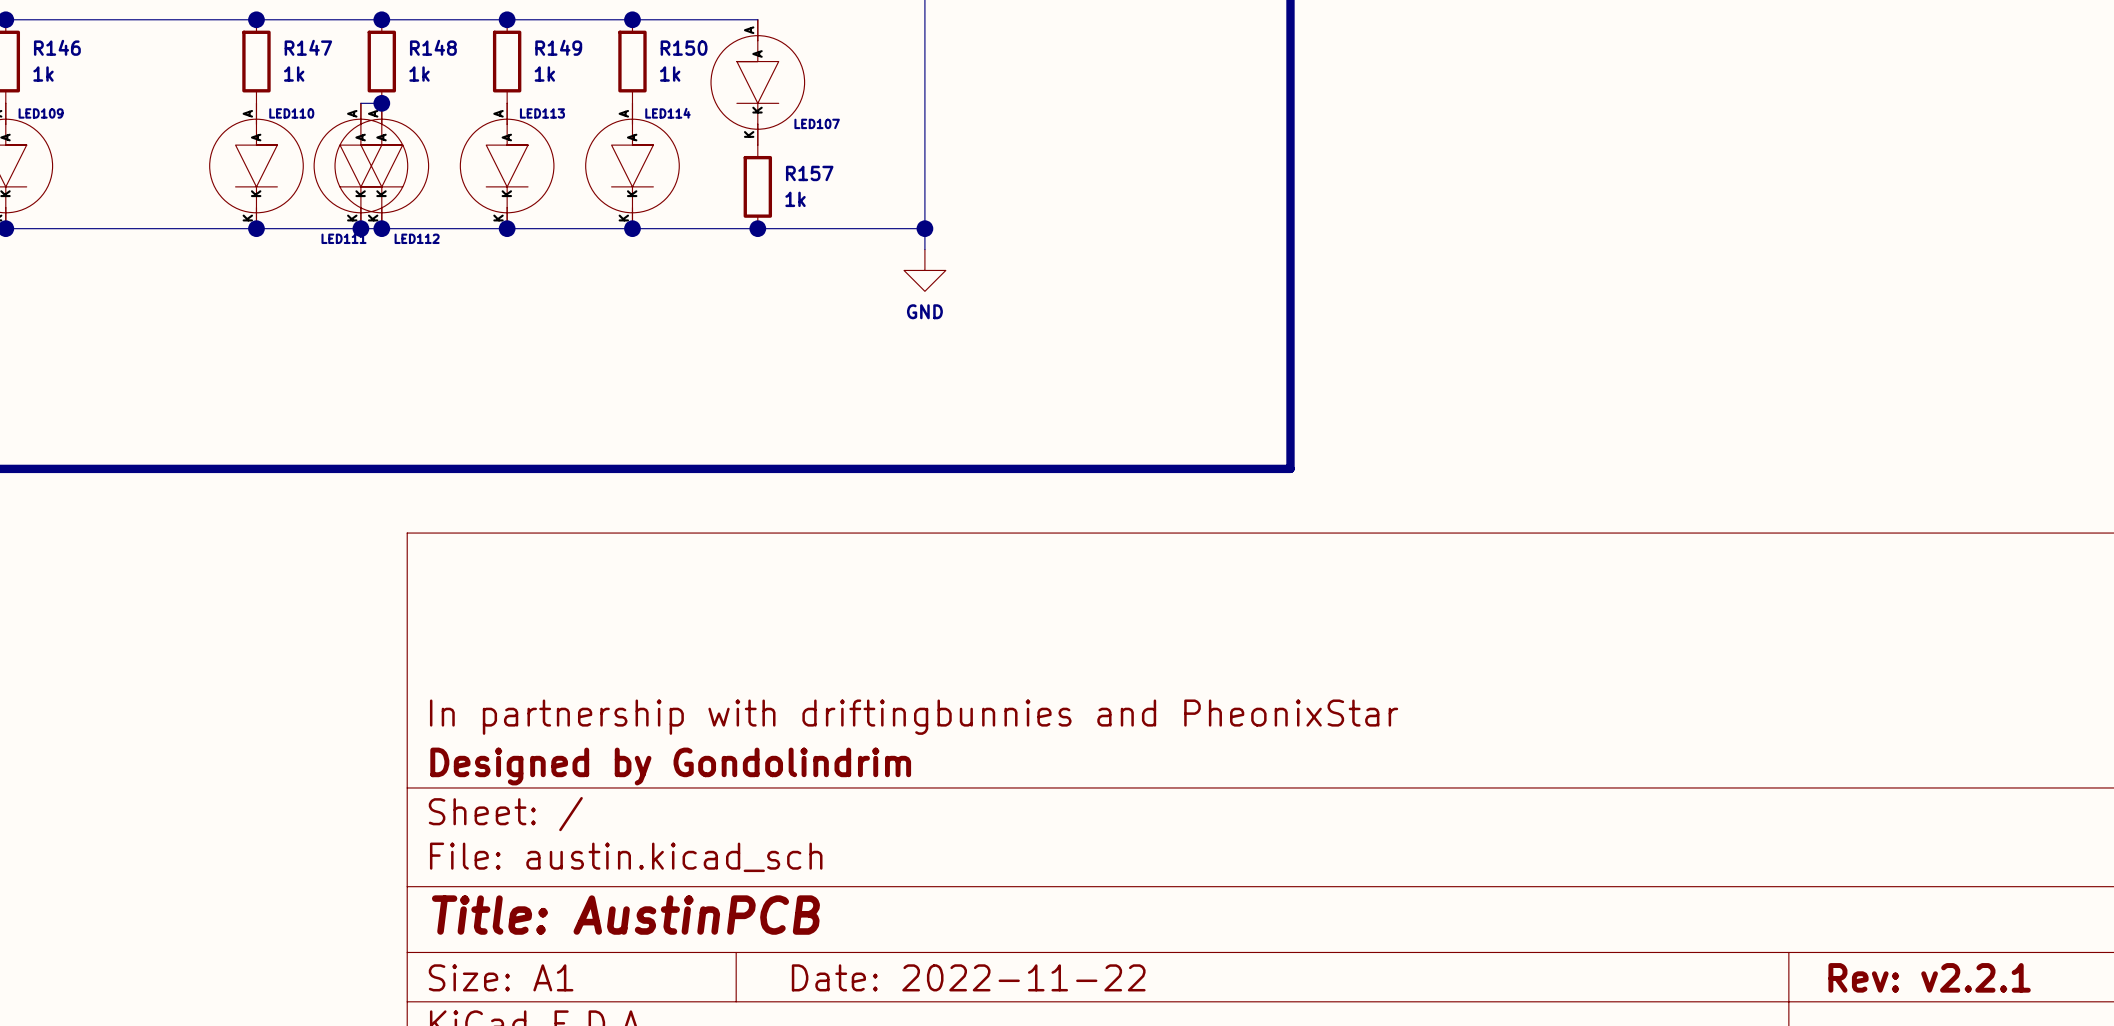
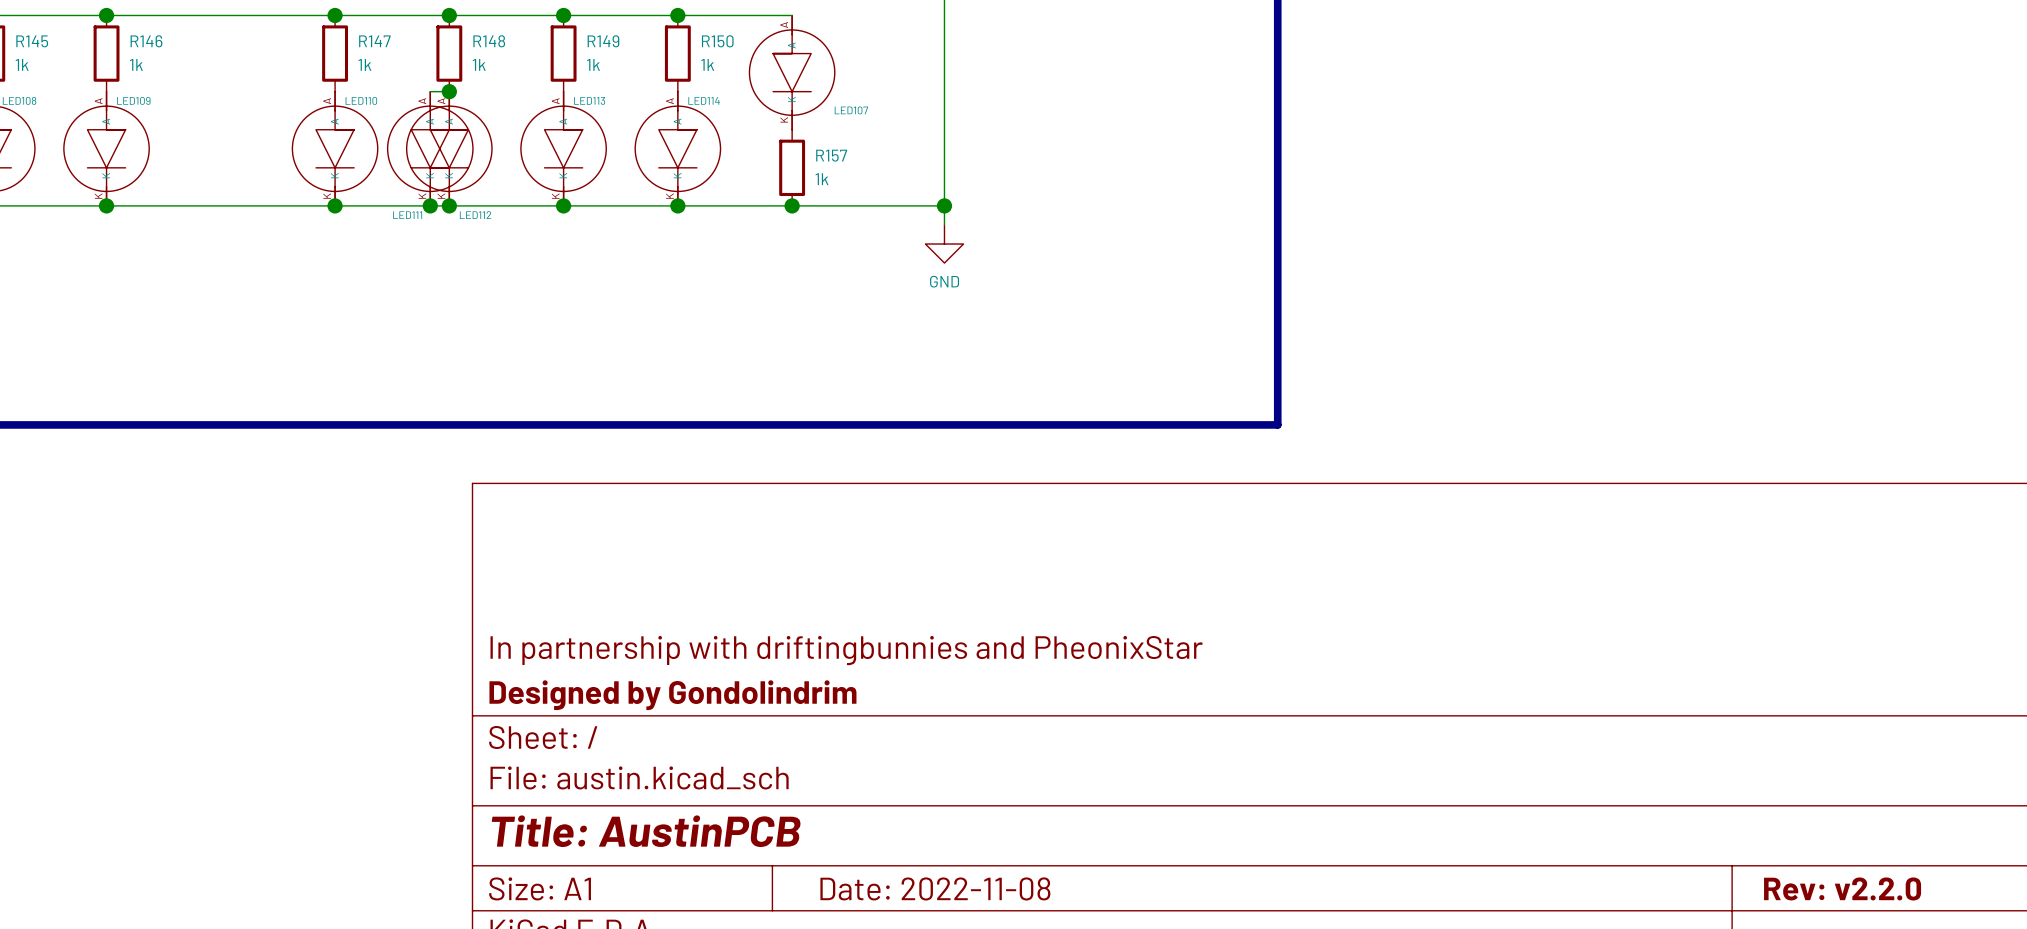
title block: Date: 2022-11-22 (968, 977) -> Date: 2022-11-08 (935, 888)
title block: Rev: v2.2.1 (1929, 977) -> Rev: v2.2.0 (1842, 888)

